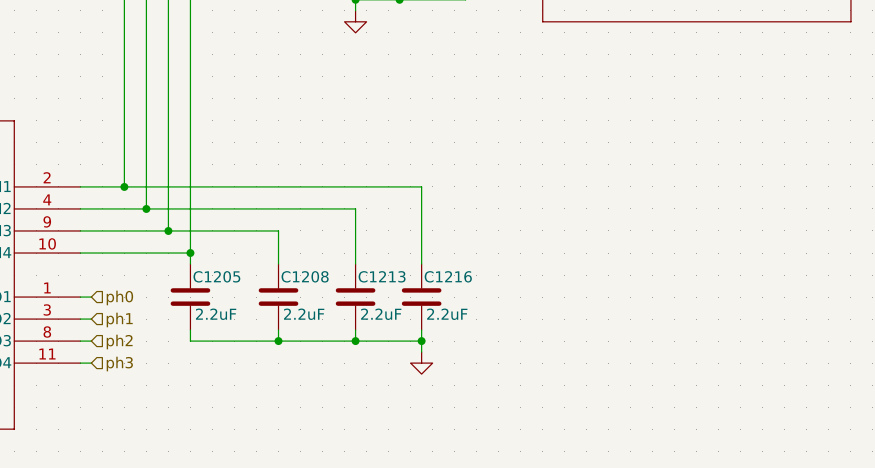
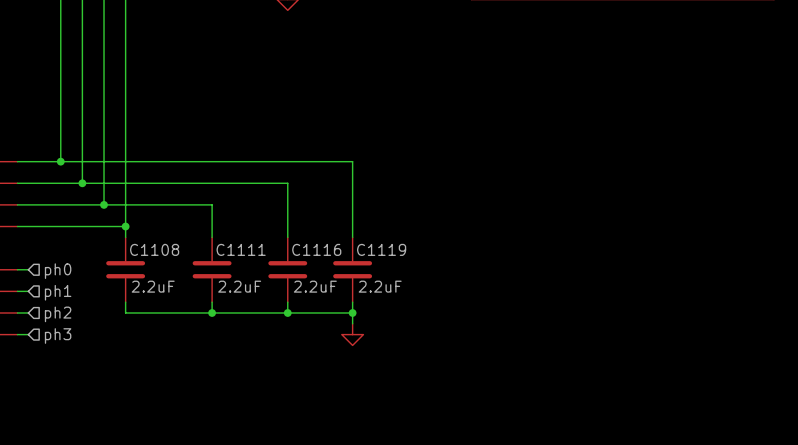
C1205 name: C1205 (216, 276) -> C1108 (154, 249)
C1208 name: C1208 (305, 276) -> C1111 (241, 249)
C1213 name: C1213 (382, 276) -> C1116 (316, 249)
C1216 name: C1216 (448, 276) -> C1119 (381, 249)

